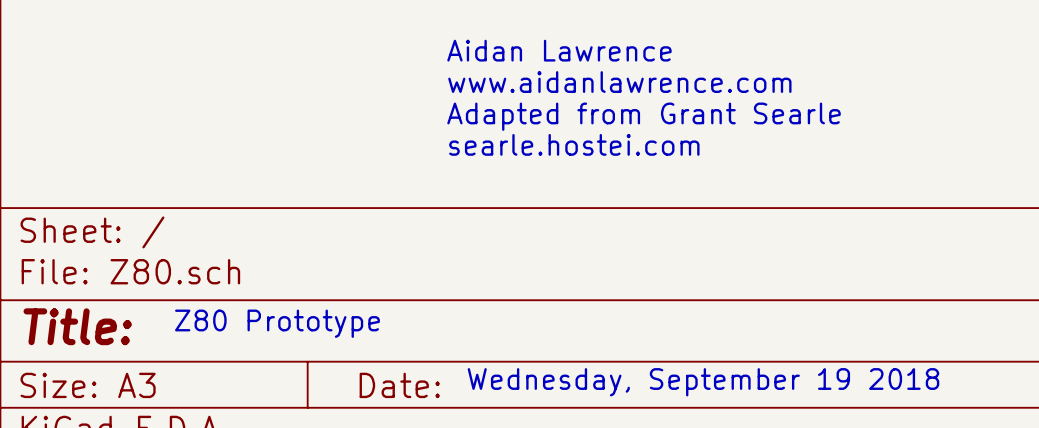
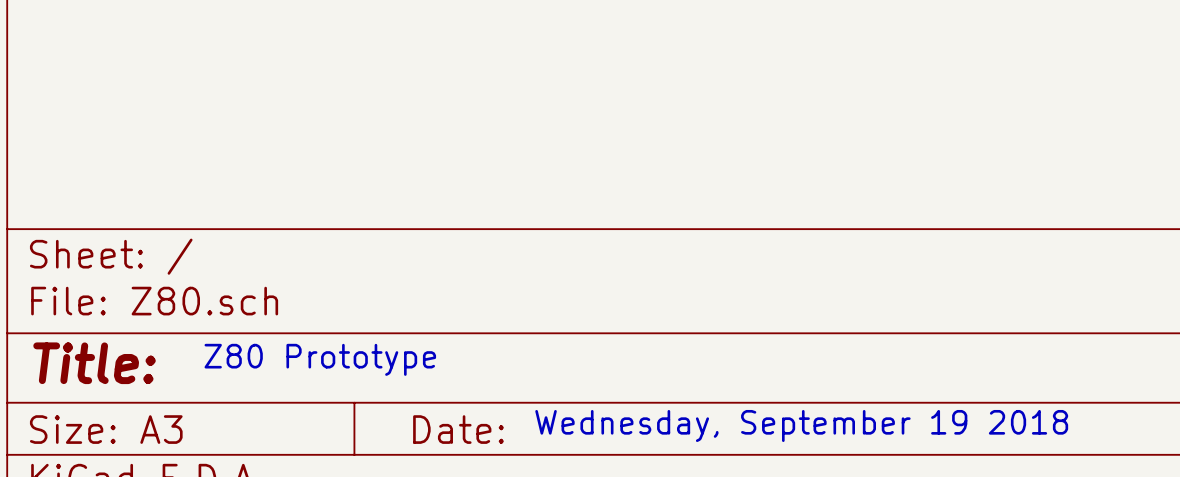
text: Aidan Lawrence (559, 50) -> none
text: www.aidanlawrence.com (619, 82) -> none
text: Adapted from Grant Searle (644, 116) -> none
text: searle.hostei.com (574, 144) -> none

